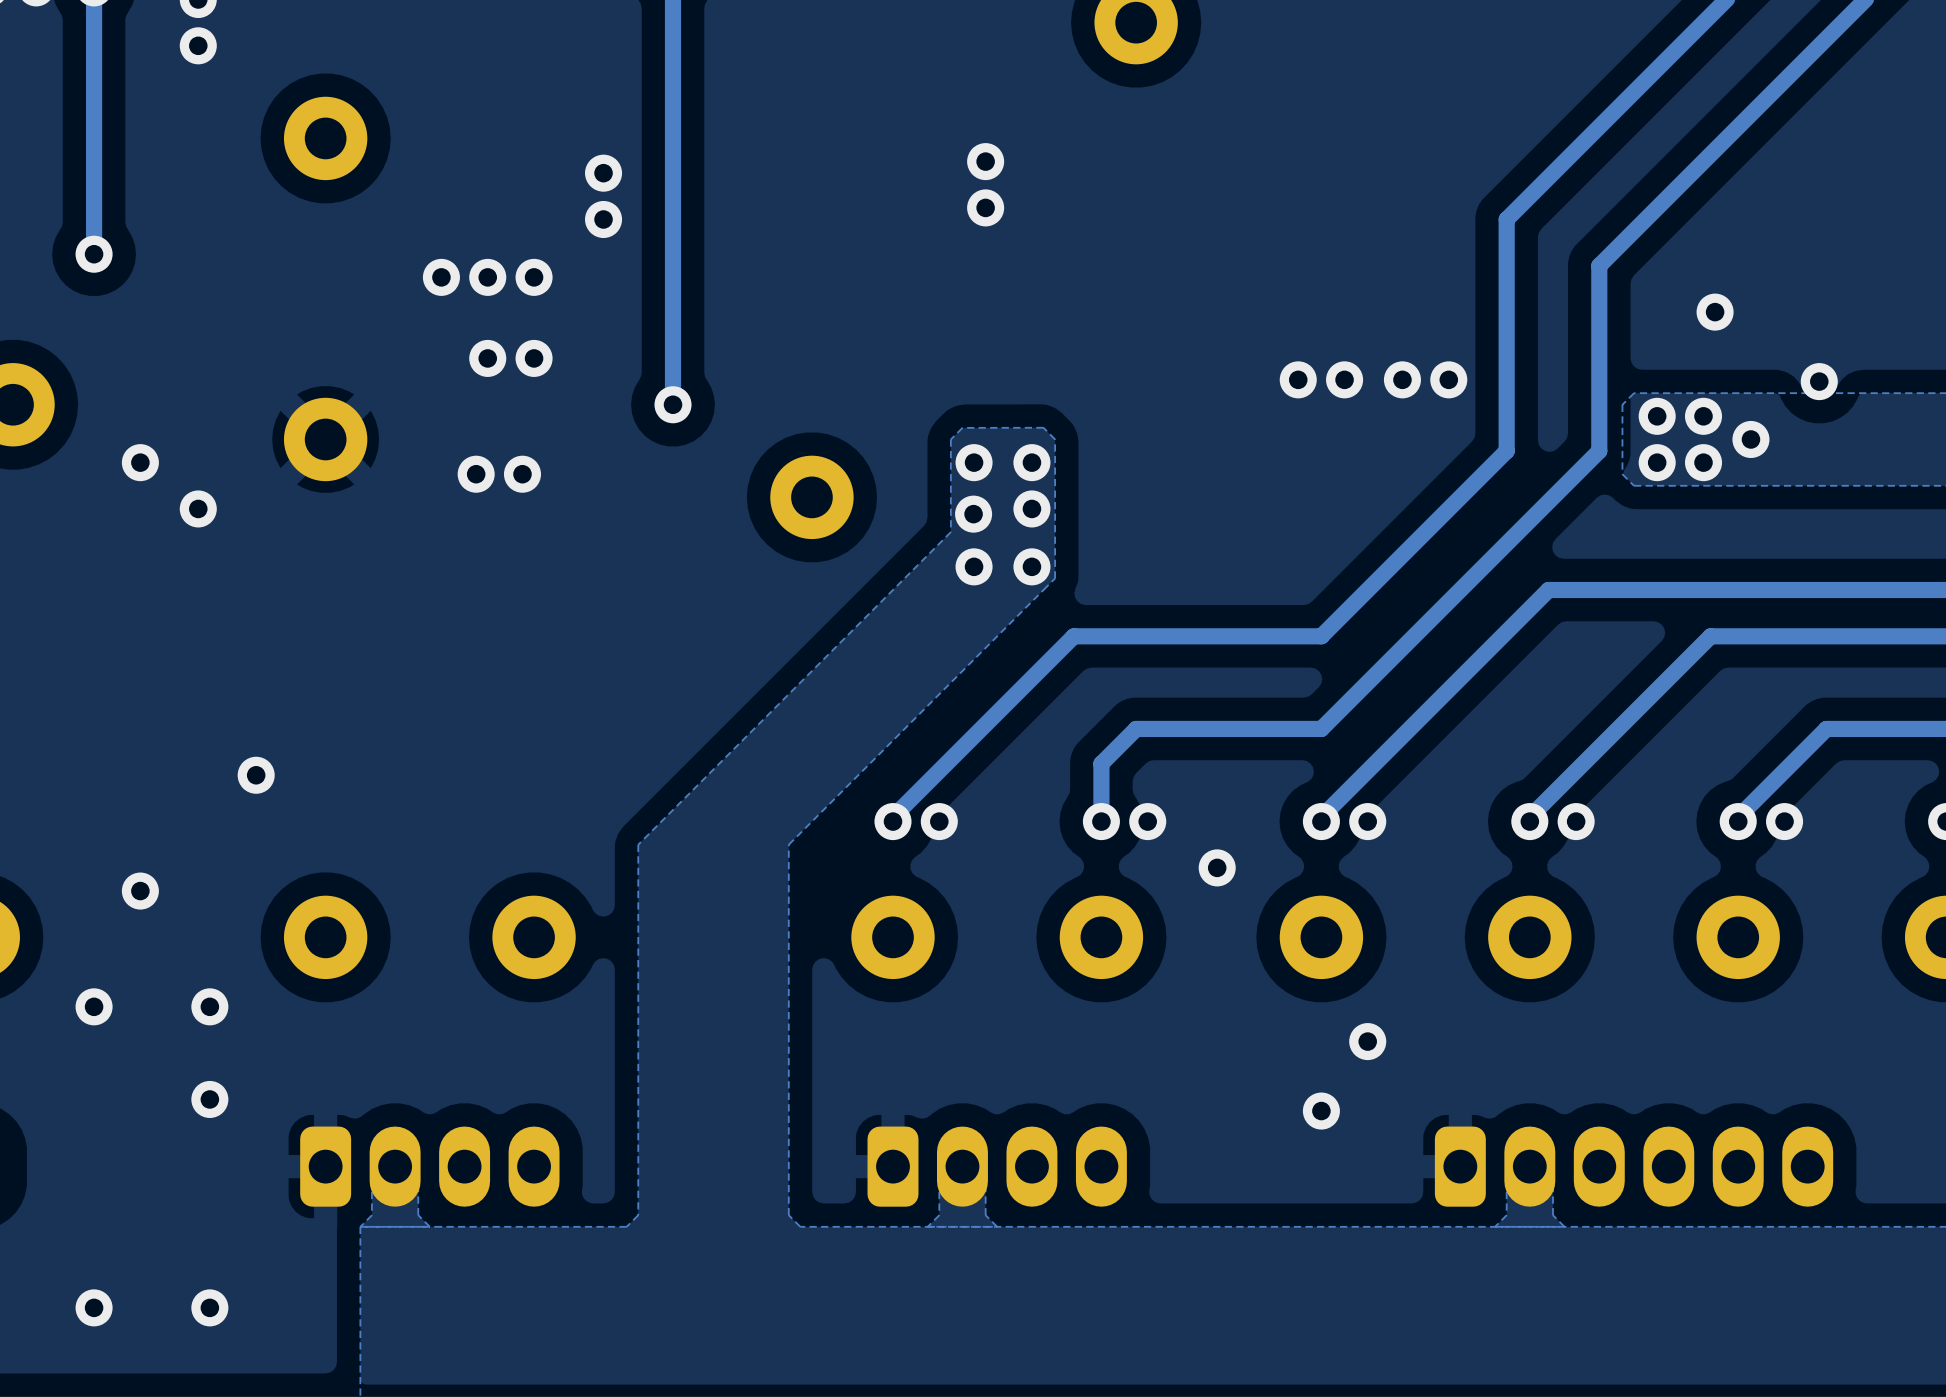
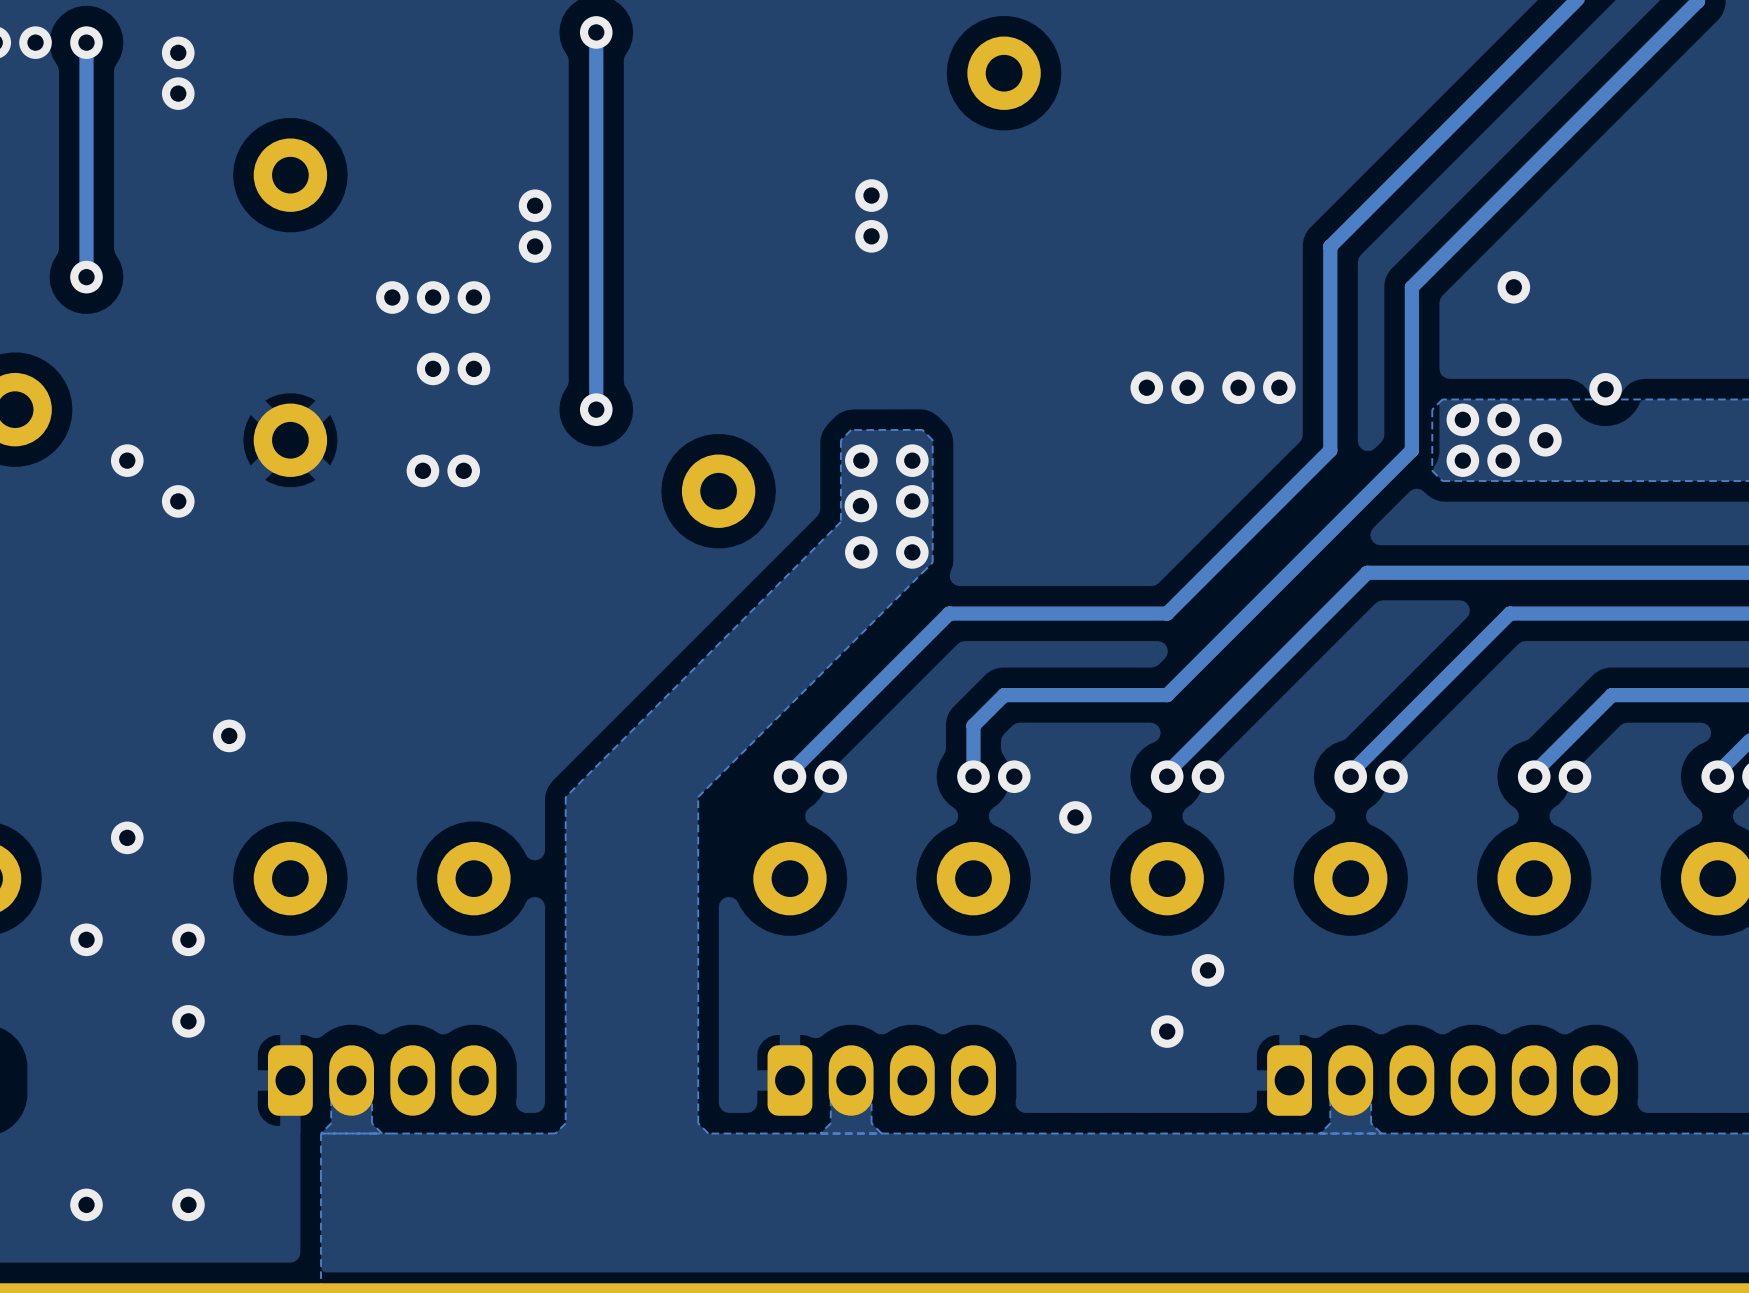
via position: (1715, 312) -> (1513, 287)

